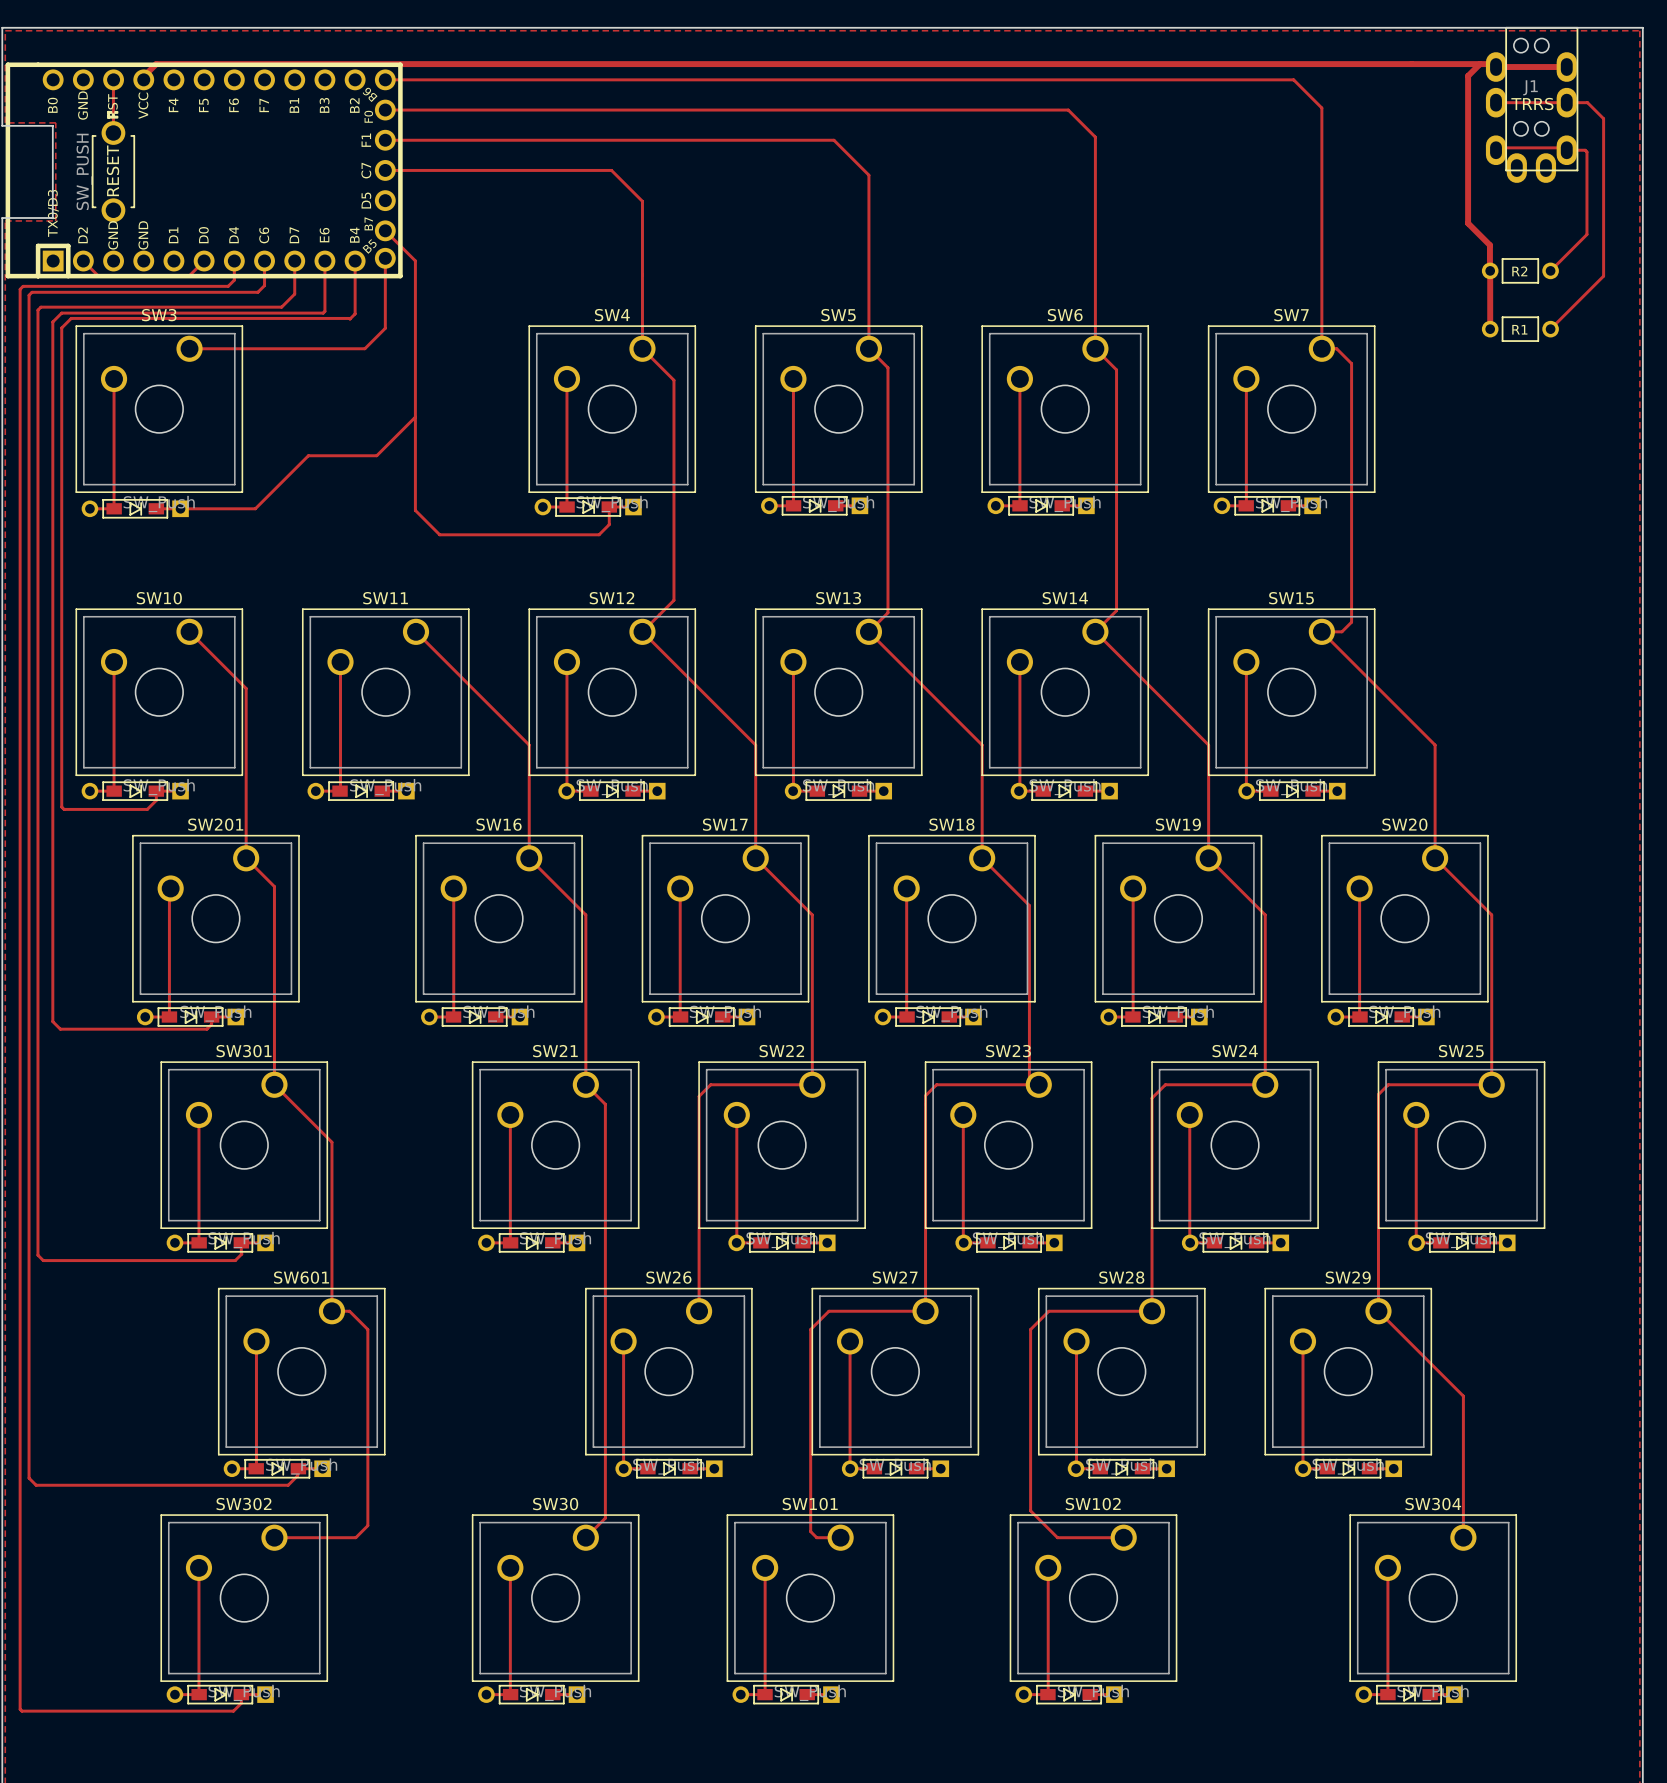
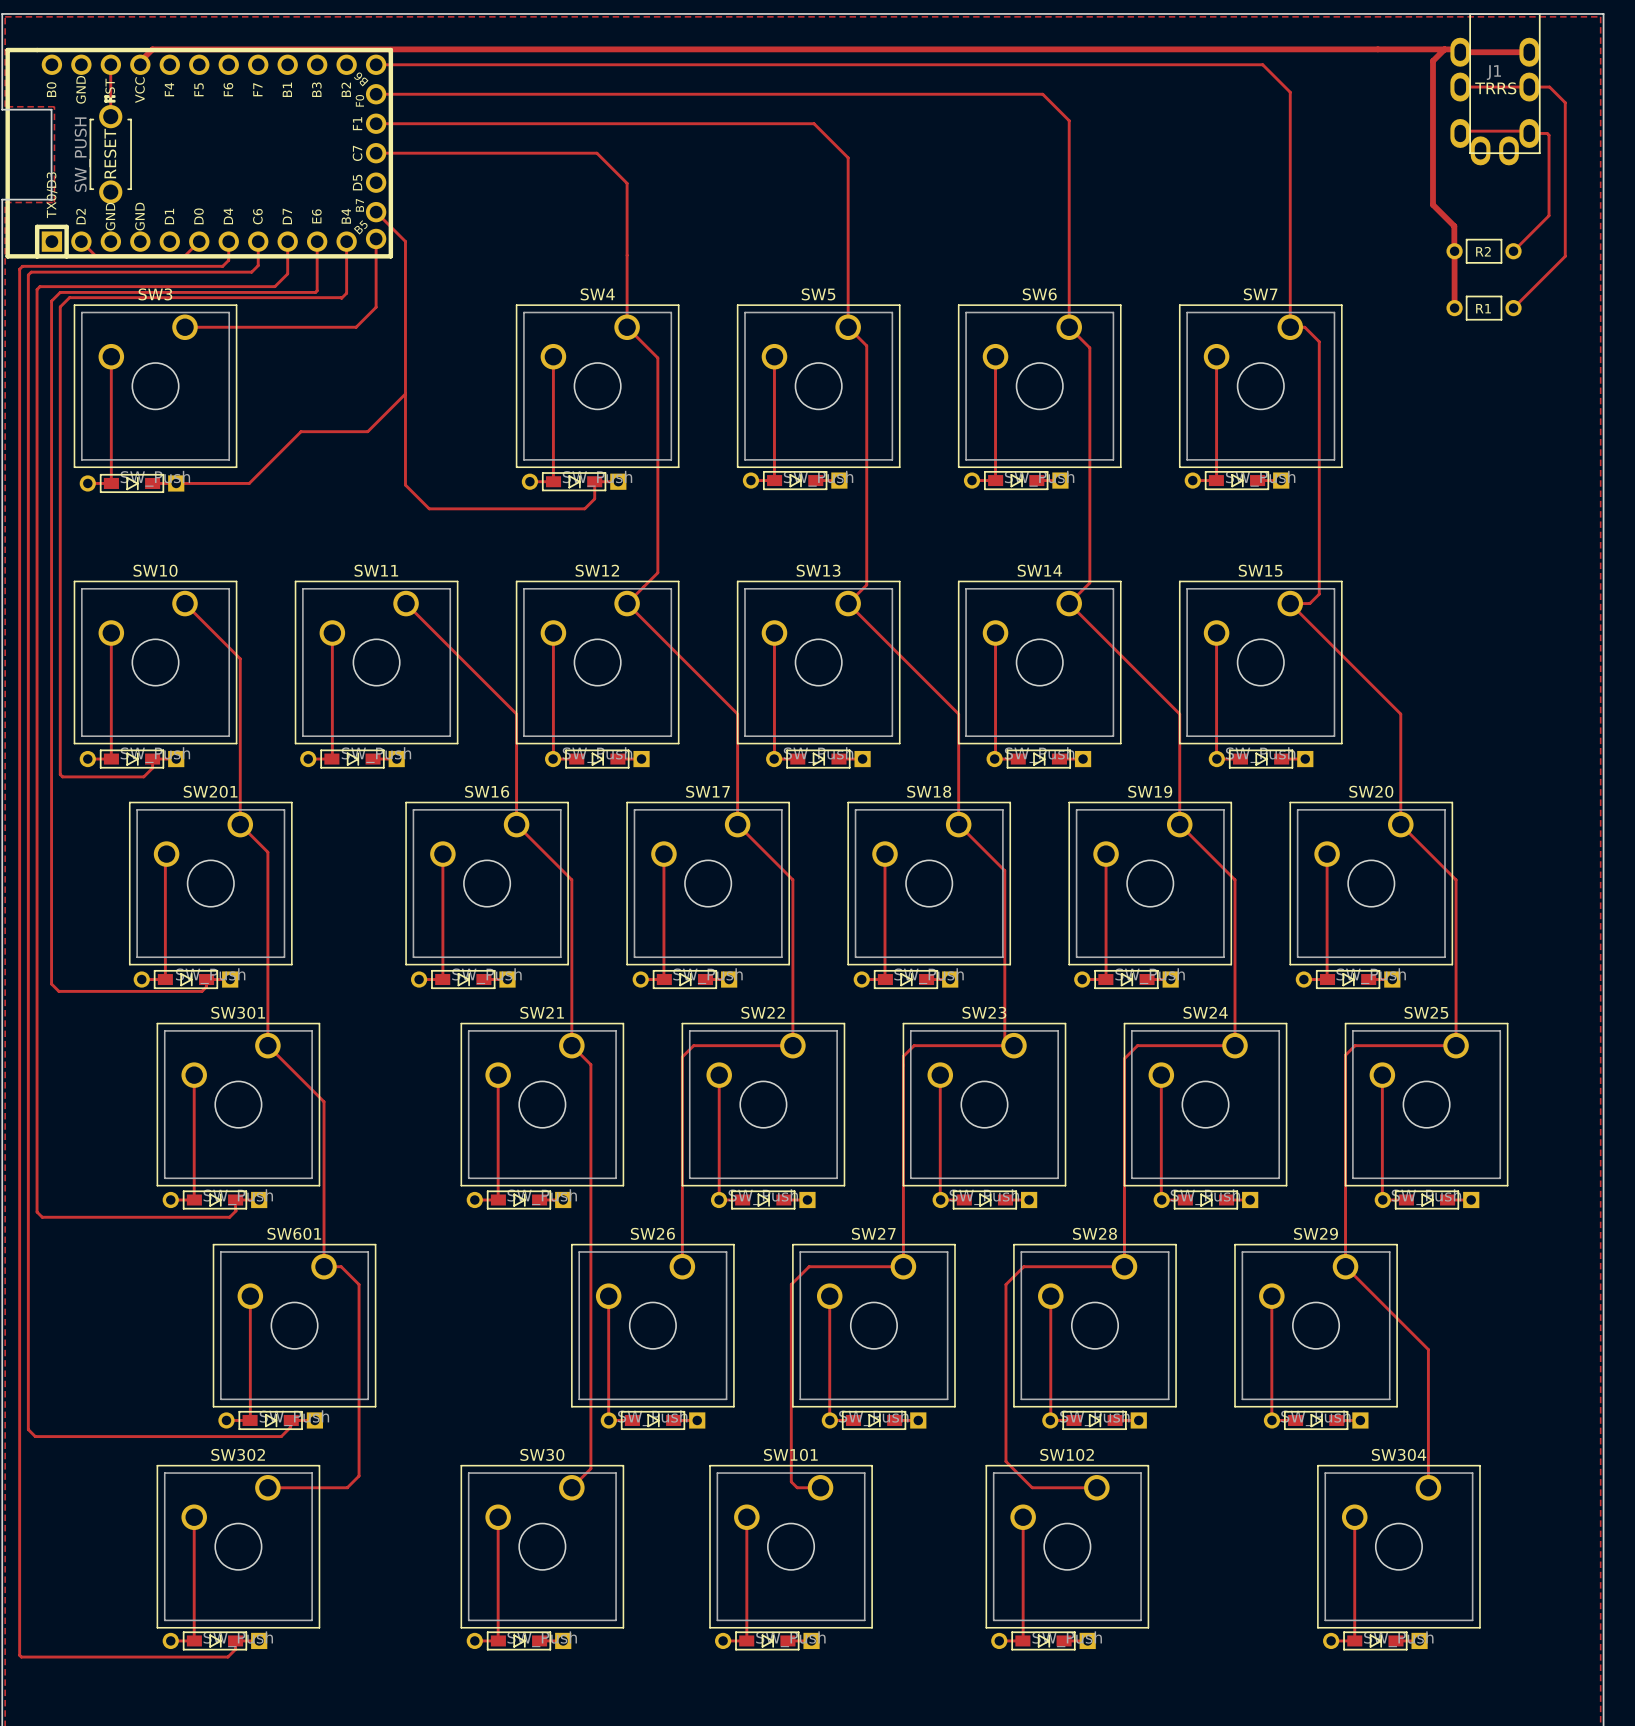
J1 footprint: [1485, 26, 1579, 183] -> [1450, 13, 1541, 166]

